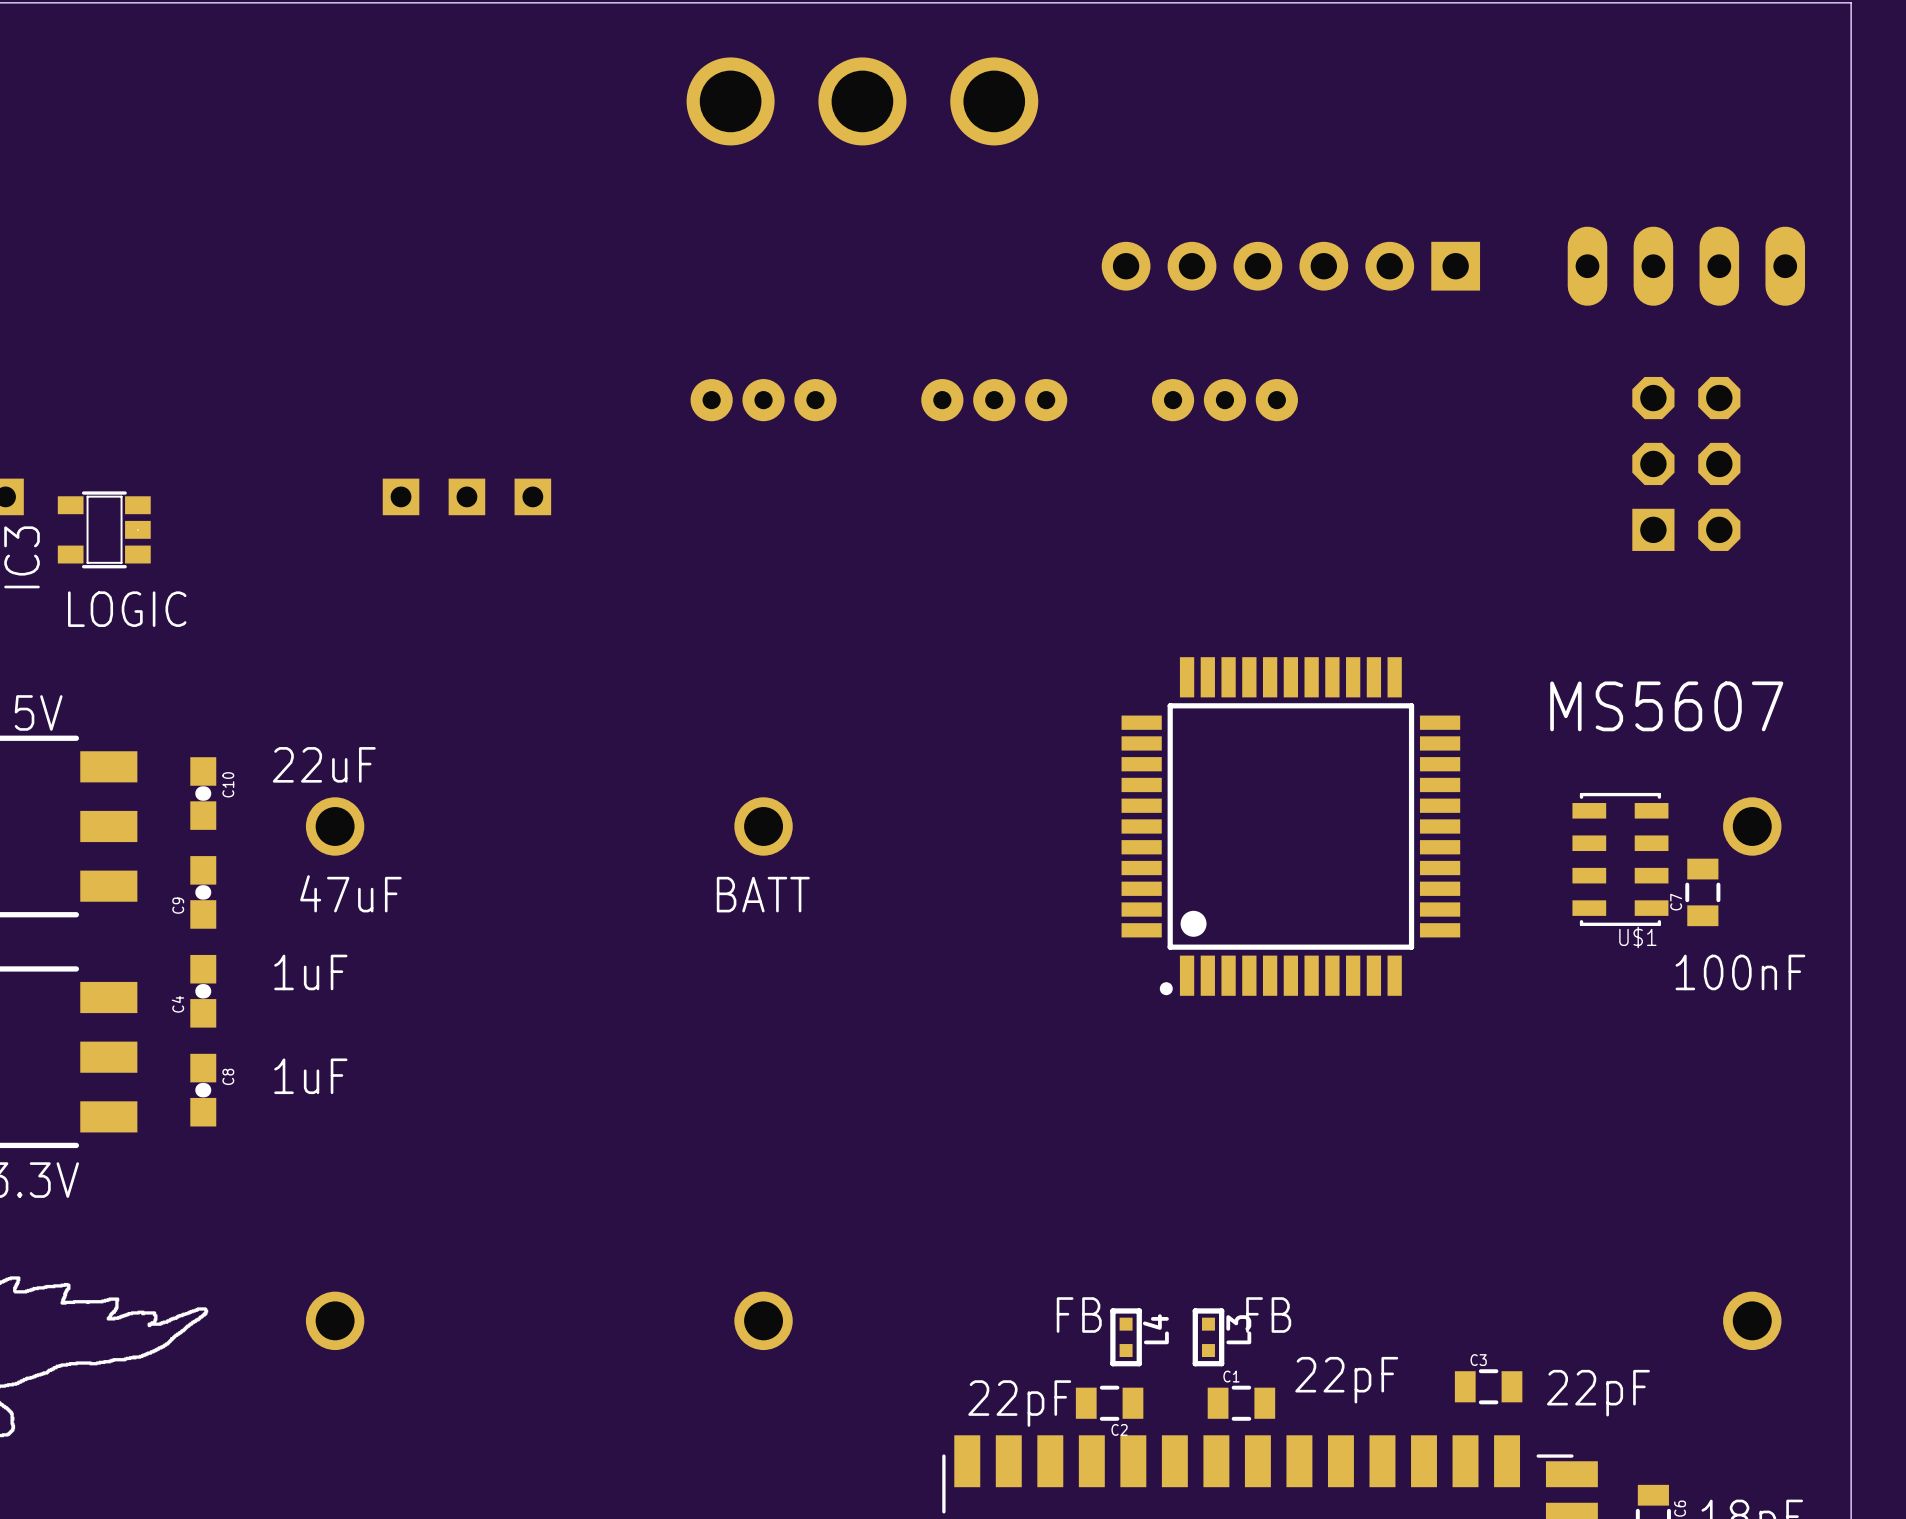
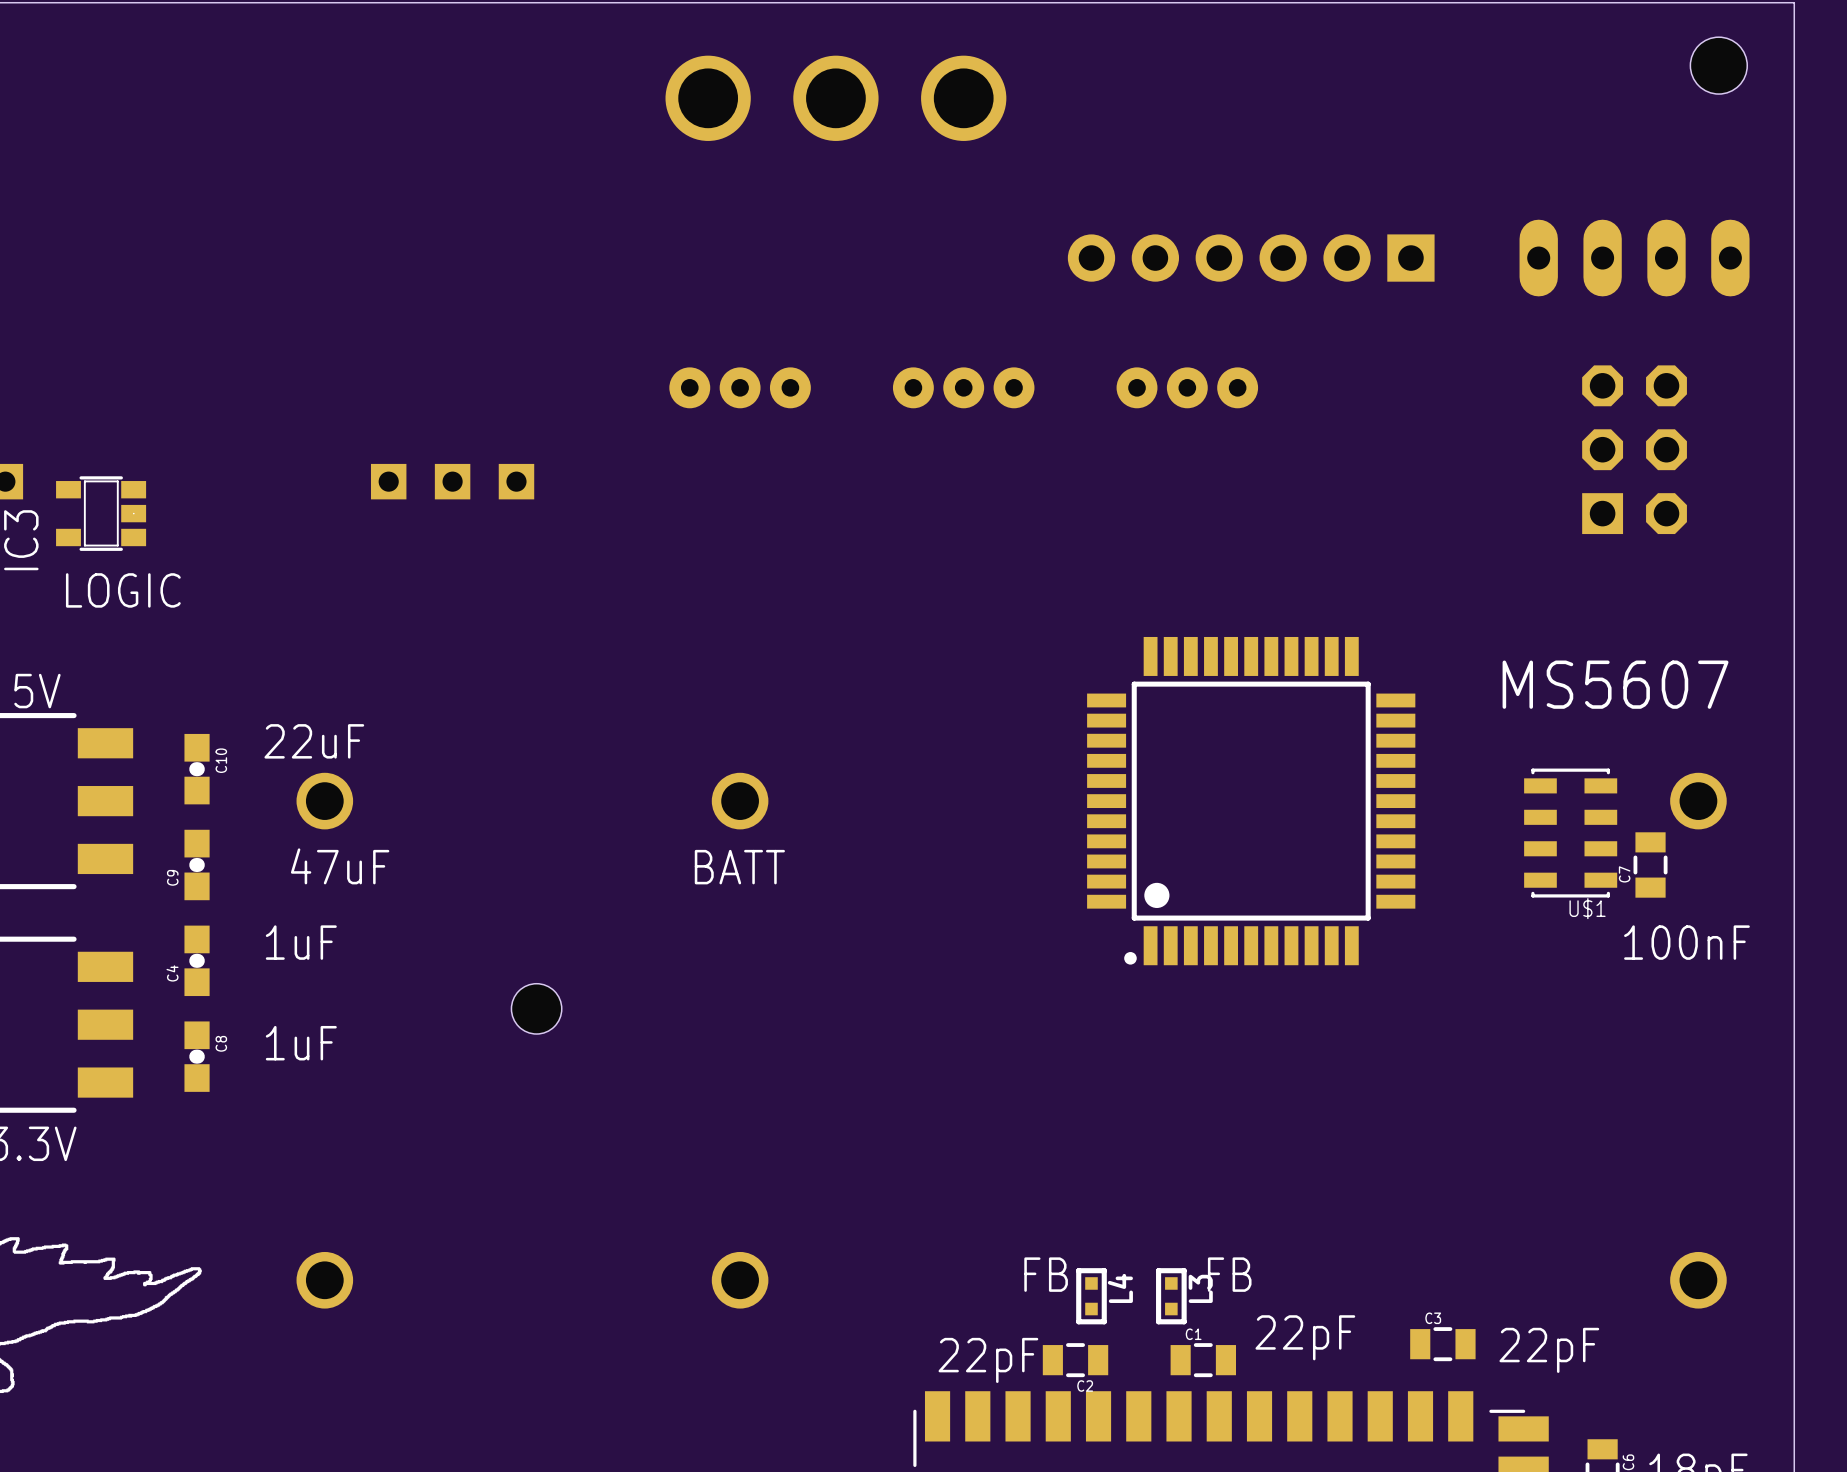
hole: none -> (1718, 65)
hole: none -> (536, 1008)

